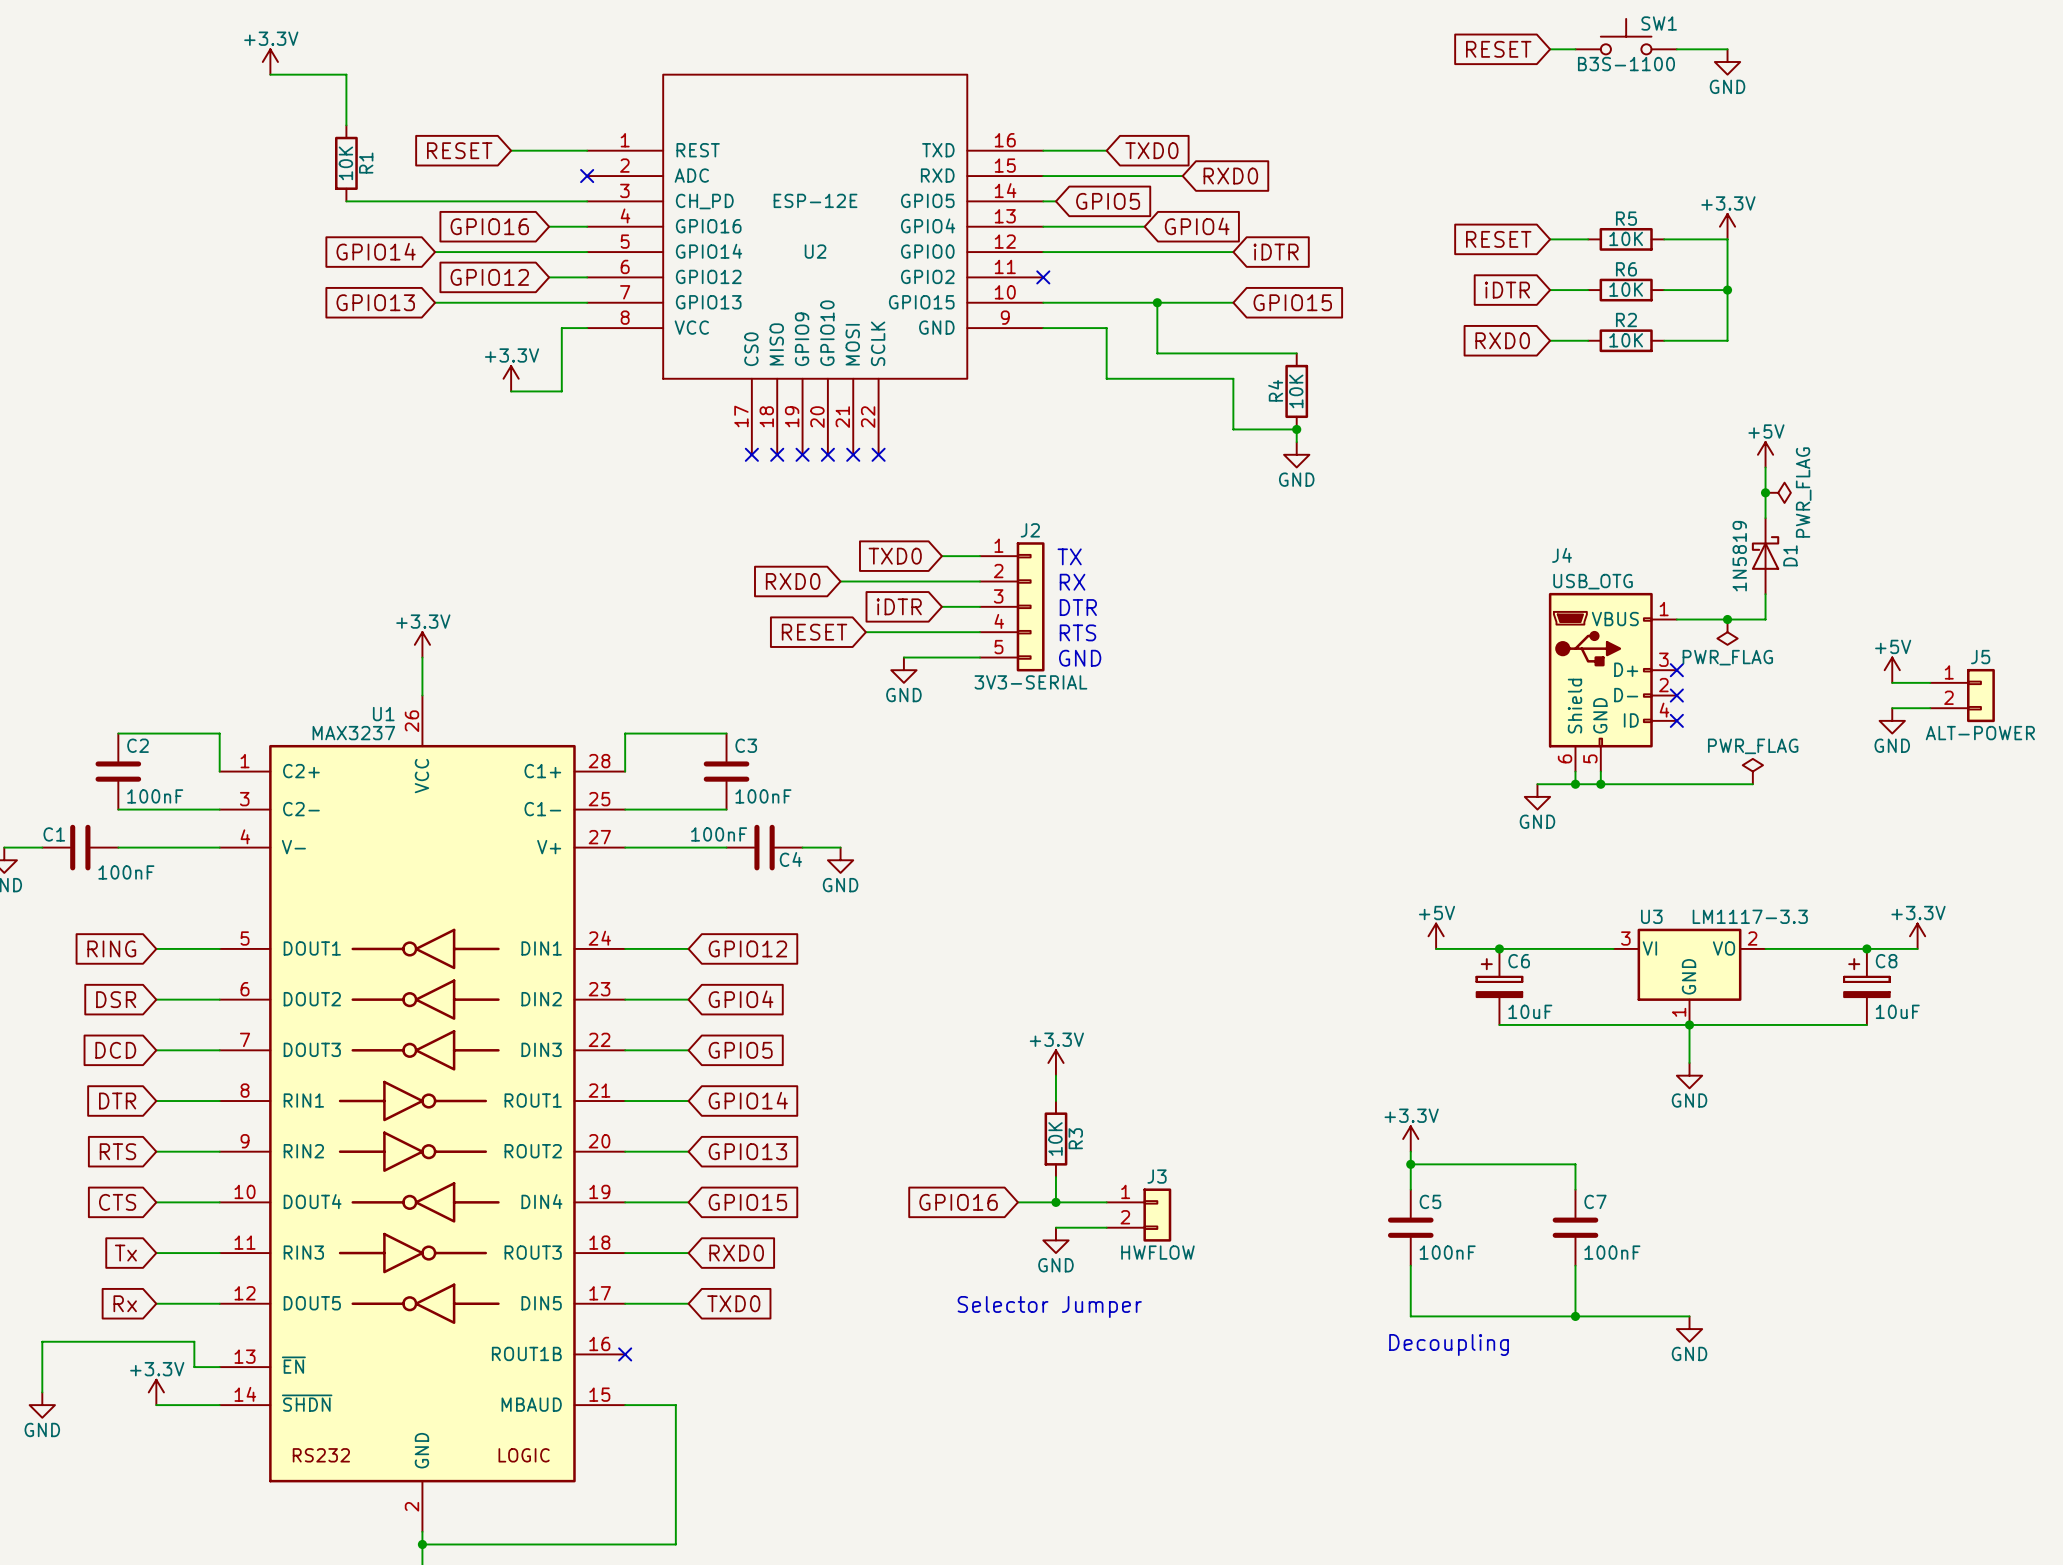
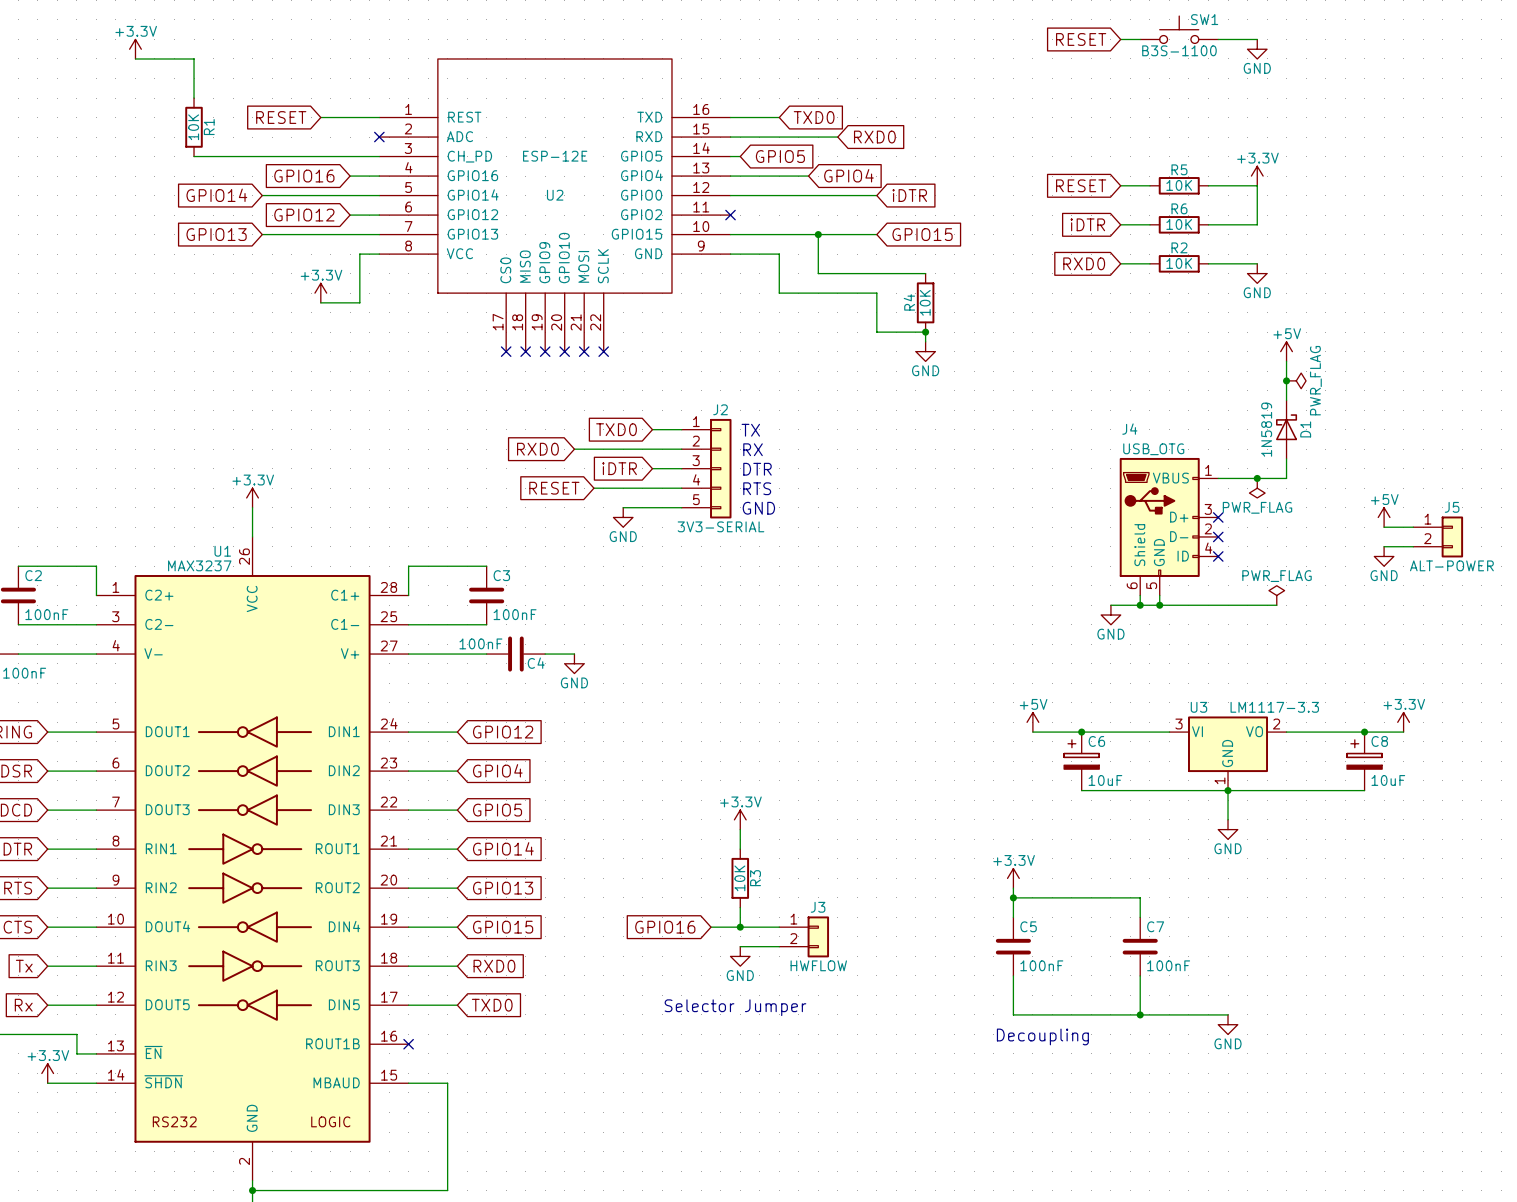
wire: (1727, 290) (1727, 340) -> none
junction: (1727, 290) -> none
power symbol: none -> GND (1257, 273)

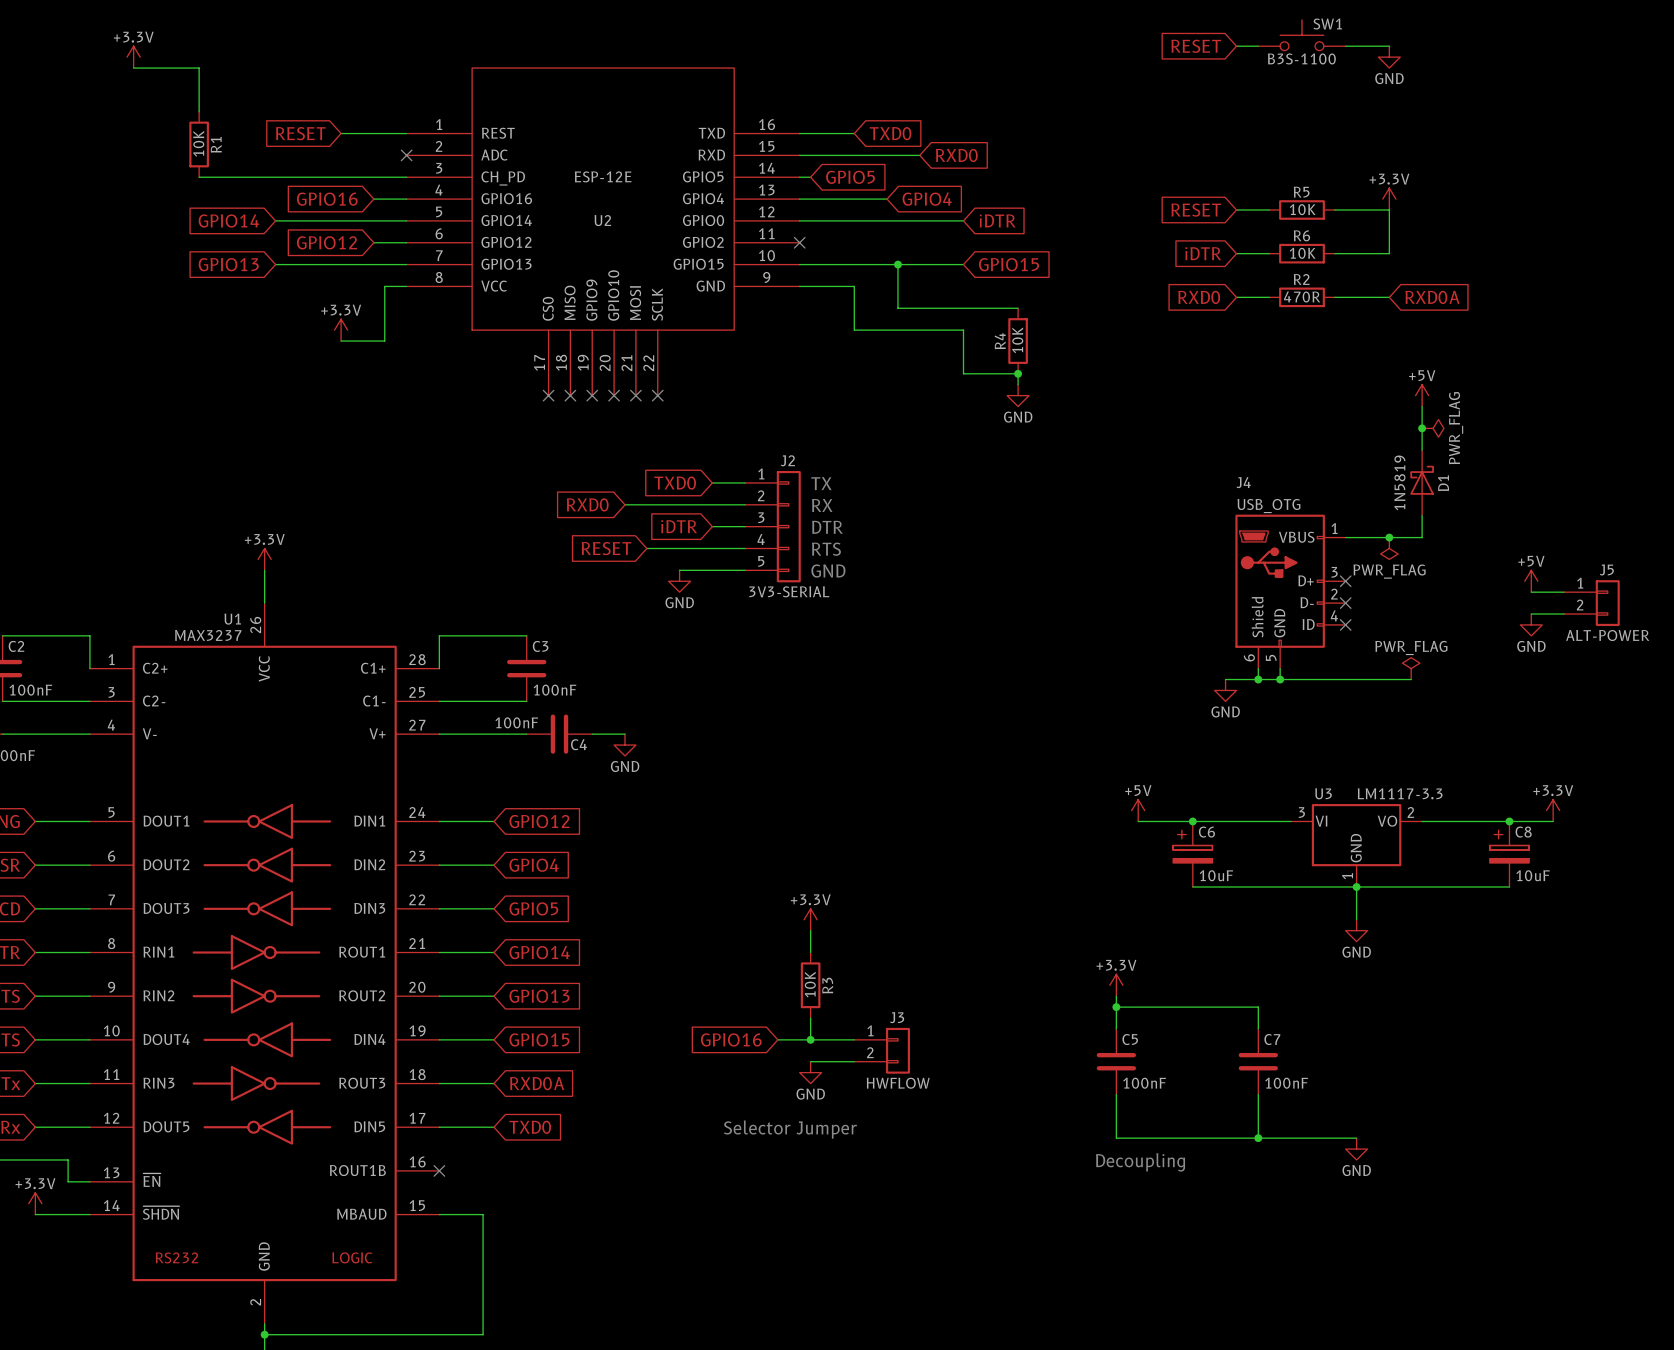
R2 value: 10K (1179, 263) -> 470R (1302, 297)
global label: none -> RXD0A (1432, 297)
power symbol: GND (1257, 273) -> none
global label: RXD0 (494, 966) -> RXD0A (537, 1083)

